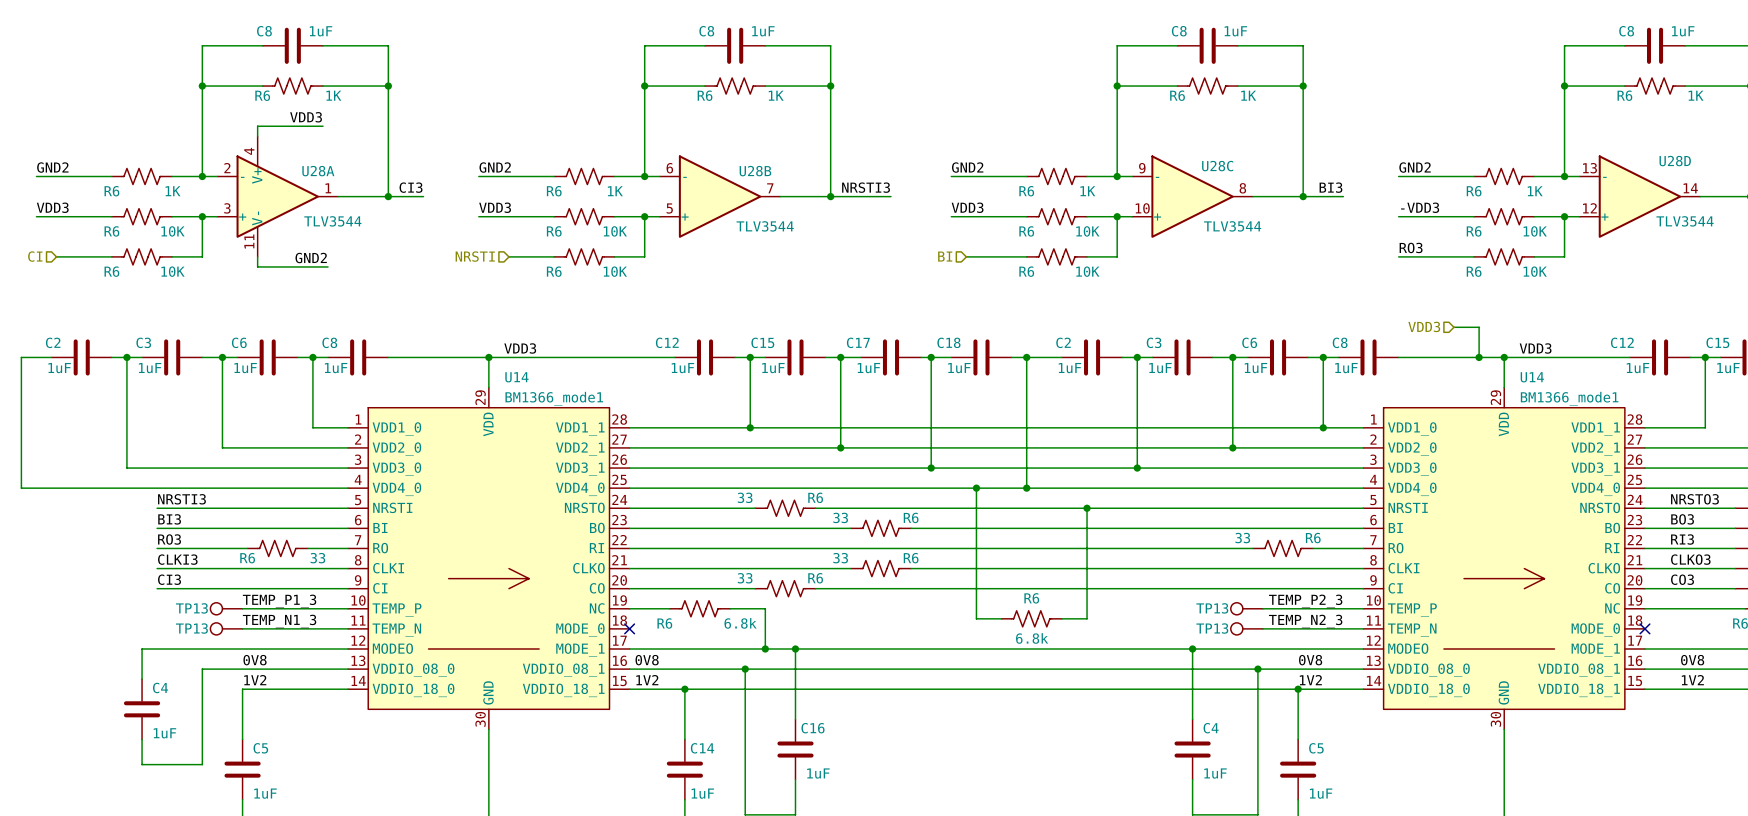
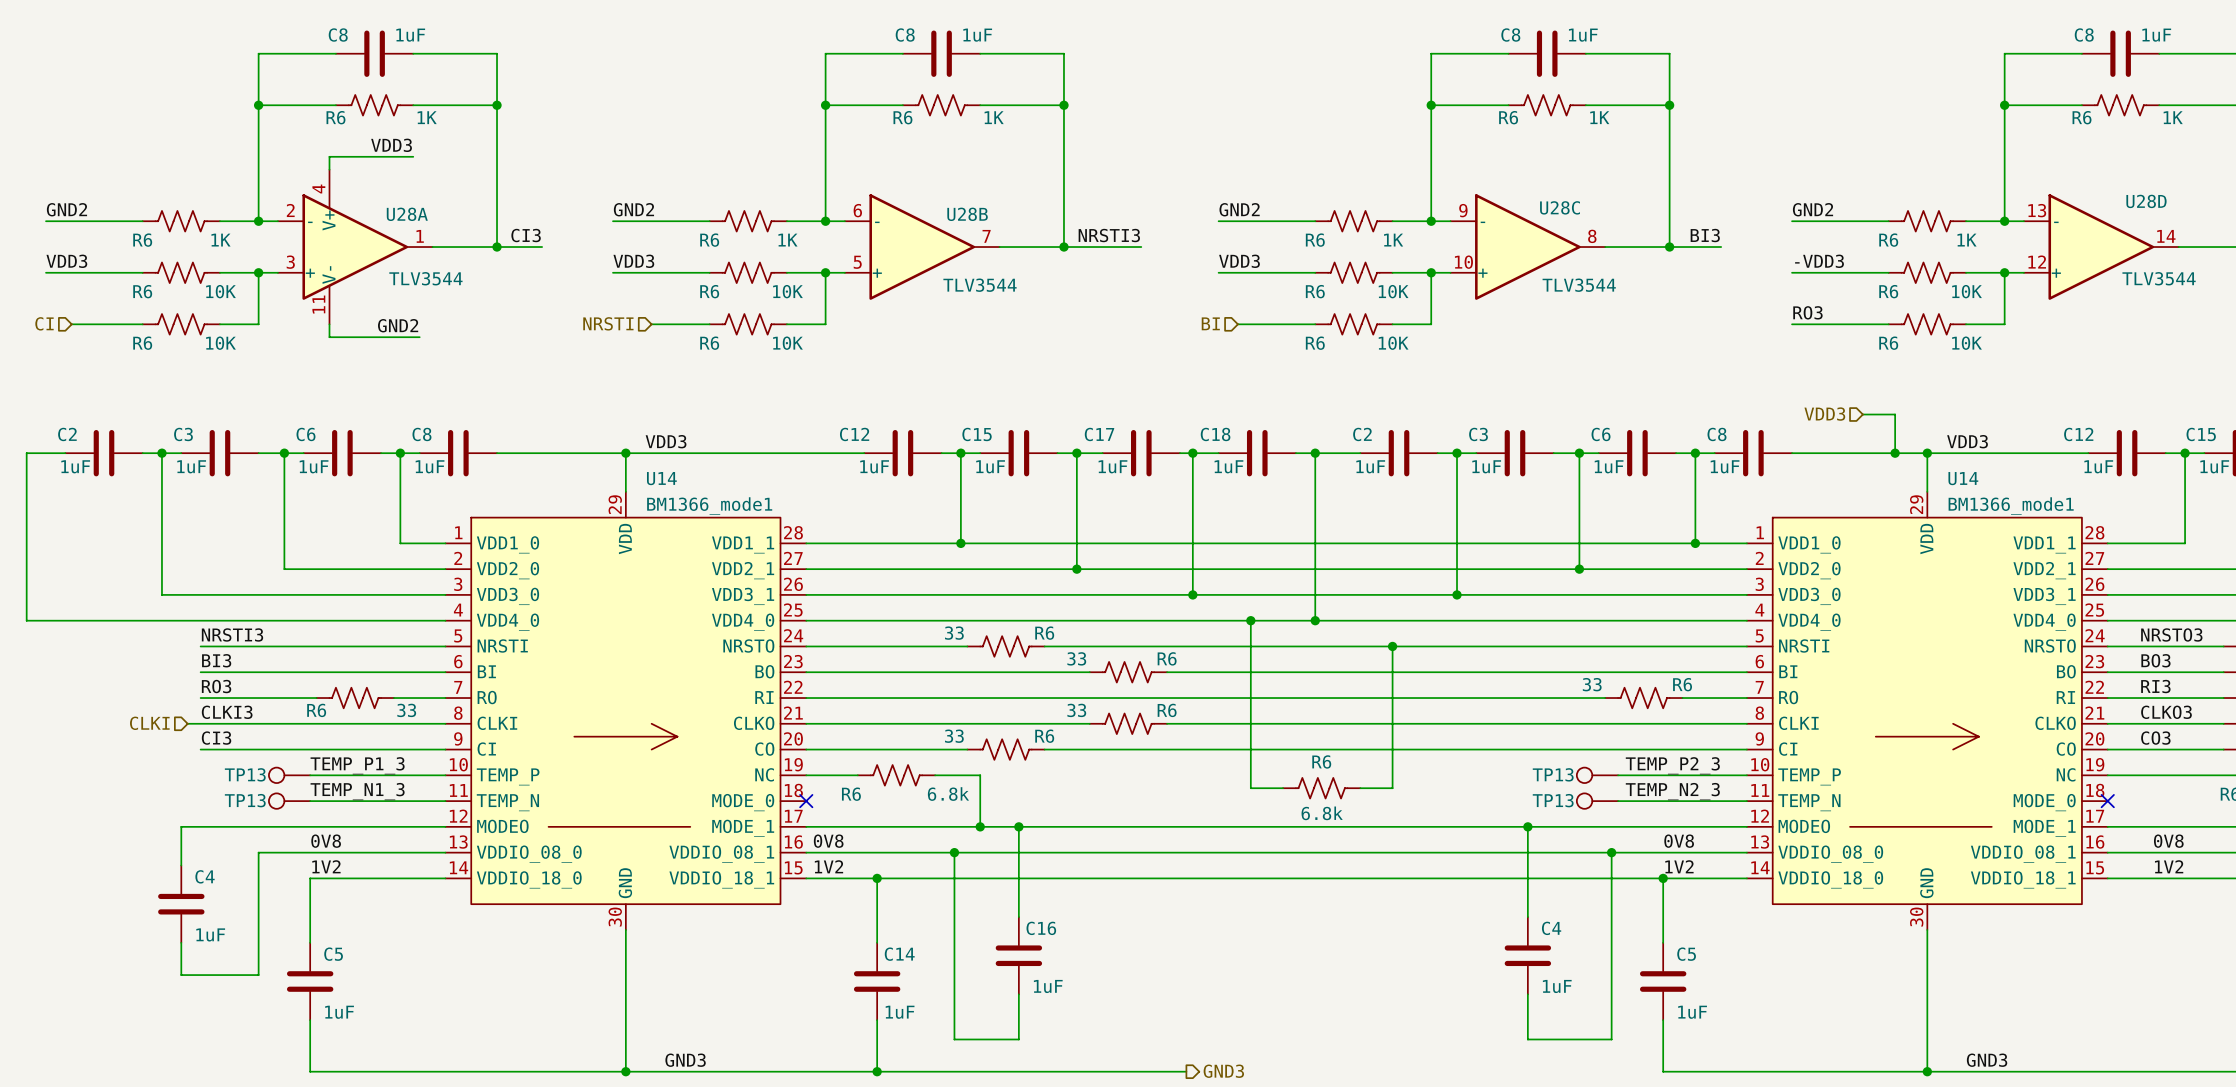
hierarchical label: none -> CLKI (149, 723)
wire: none -> (187, 723) (200, 723)

